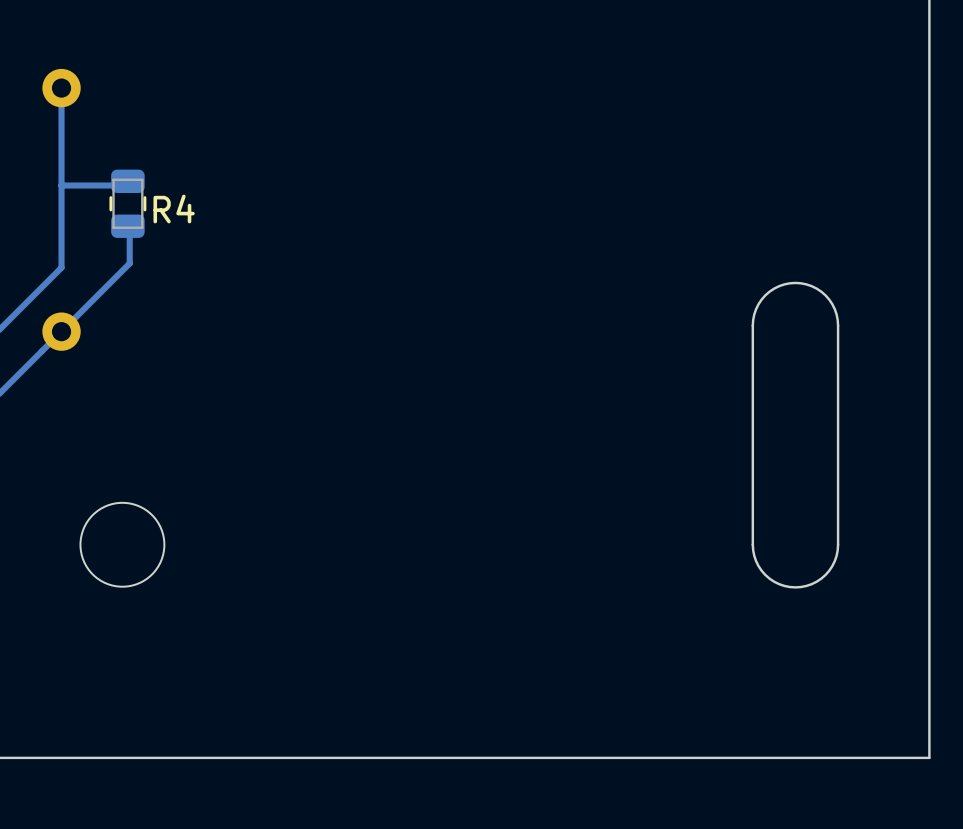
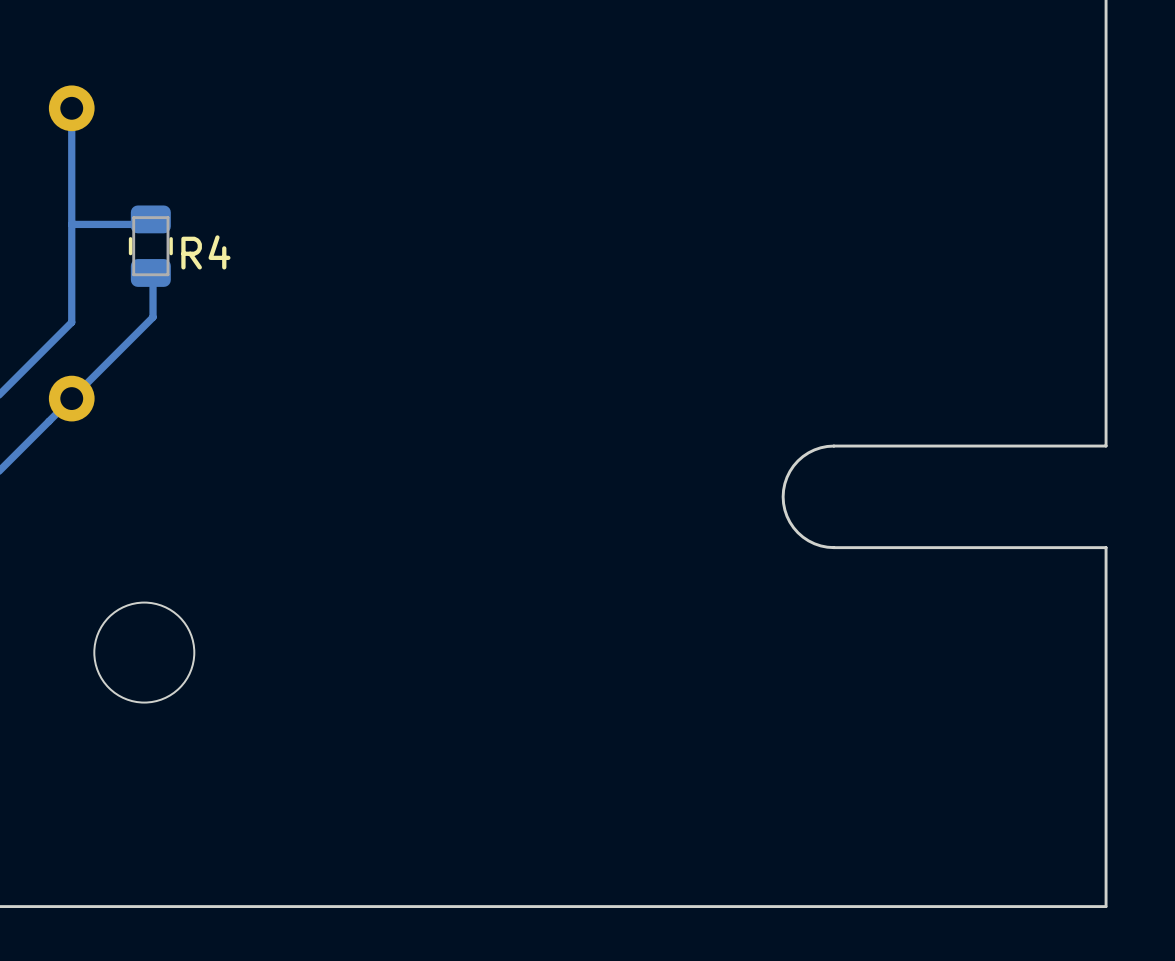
board edge: (838, 325) (837, 550) (832, 566) (821, 578) (806, 585) (789, 587) (774, 581) (765, 574) (758, 566) (753, 550) (753, 320) (758, 304) (769, 291) (784, 284) (801, 283) (816, 288) (829, 299) (834, 309) (838, 325) -> none
board edge: (929, 371) (929, 456) -> (1106, 446) (827, 446) (814, 449) (798, 460) (787, 477) (783, 496) (787, 516) (798, 532) (814, 543) (827, 547) (1106, 547)

